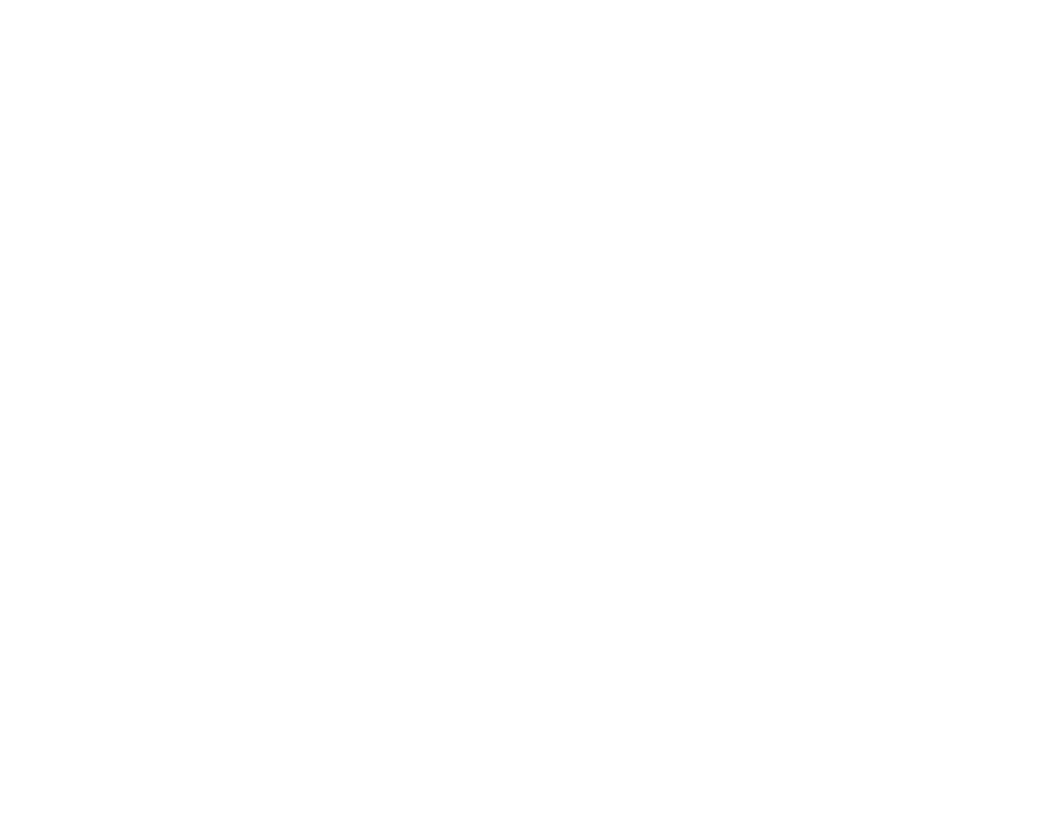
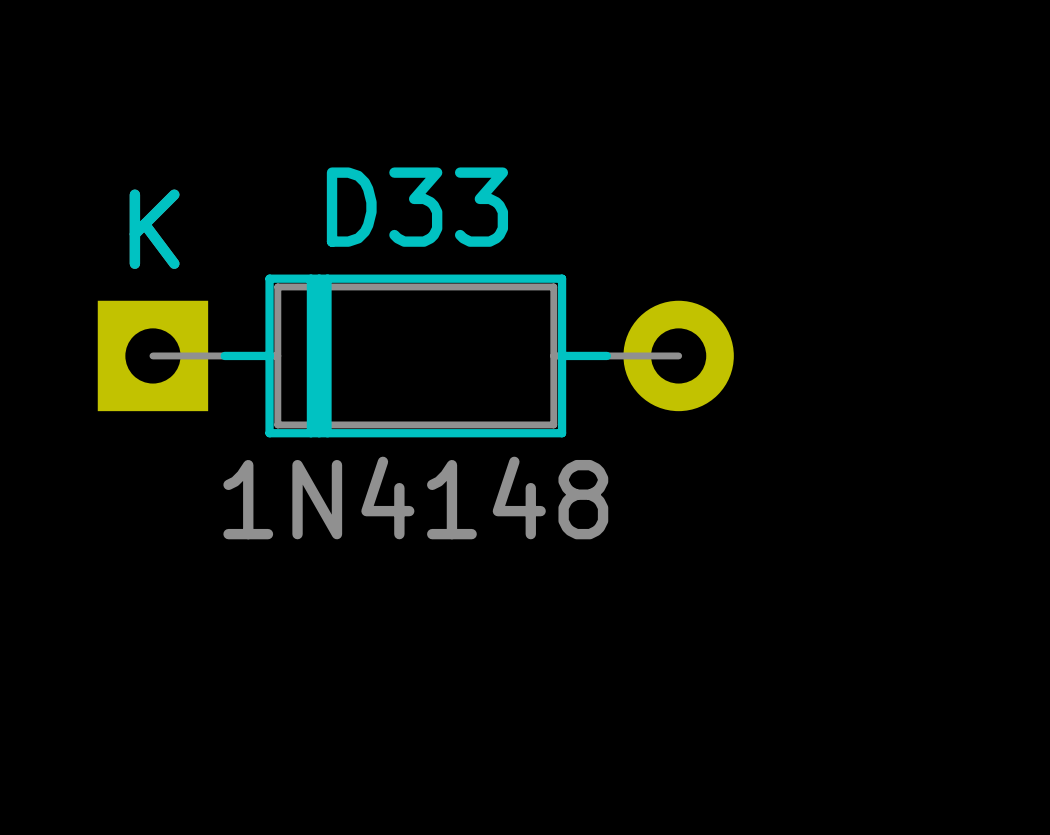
D33: none -> 1N4148 (415, 355)

